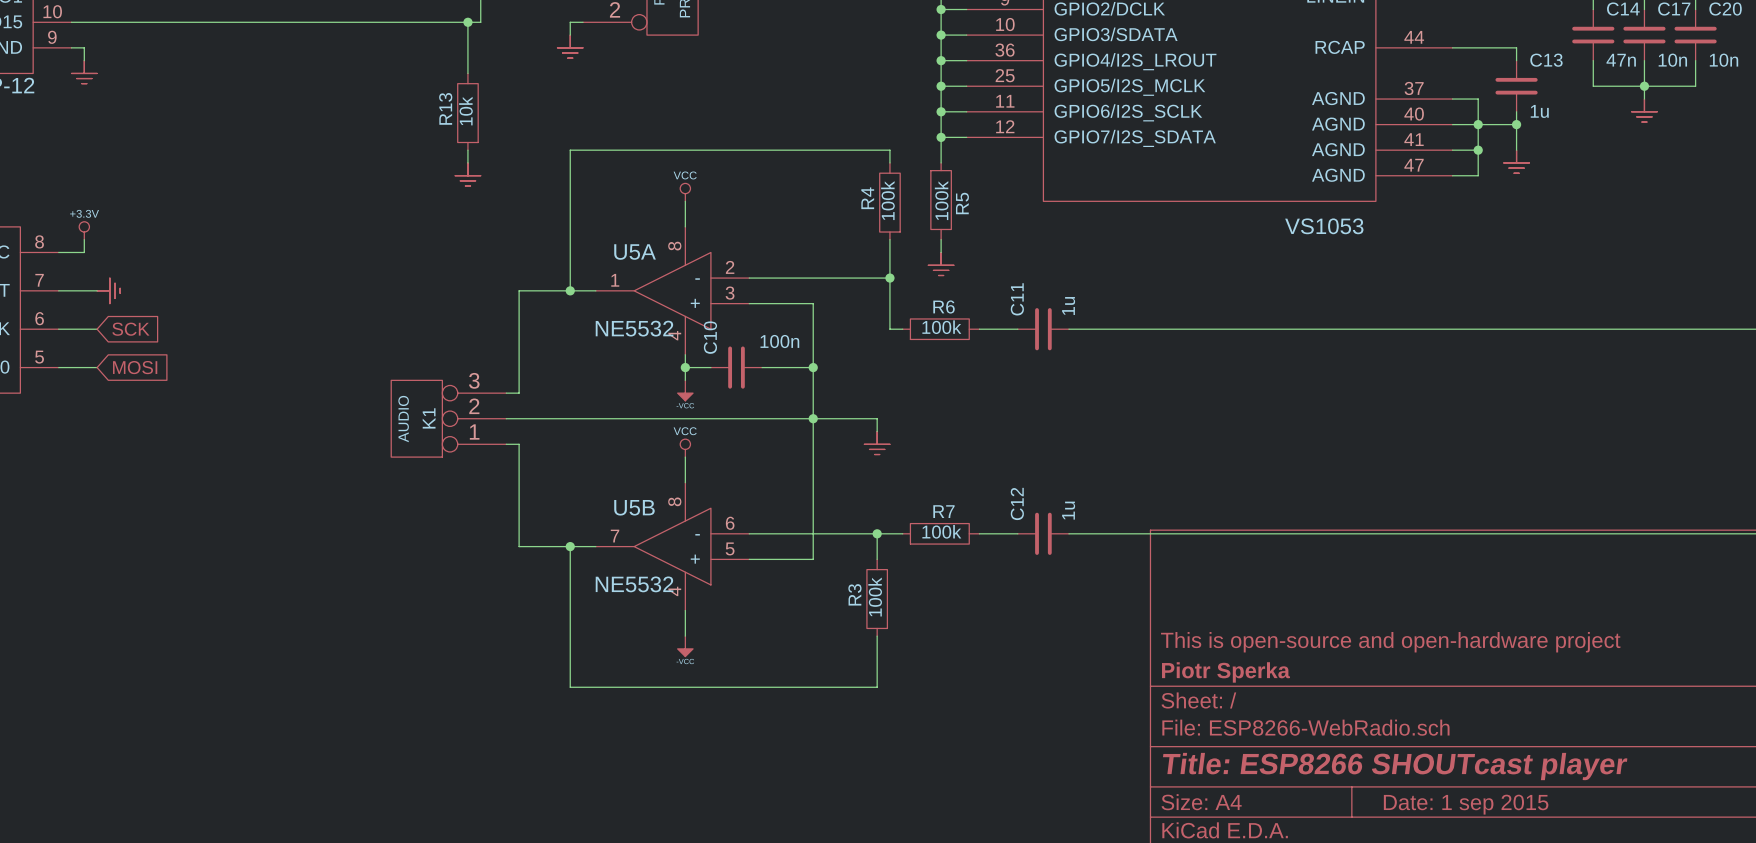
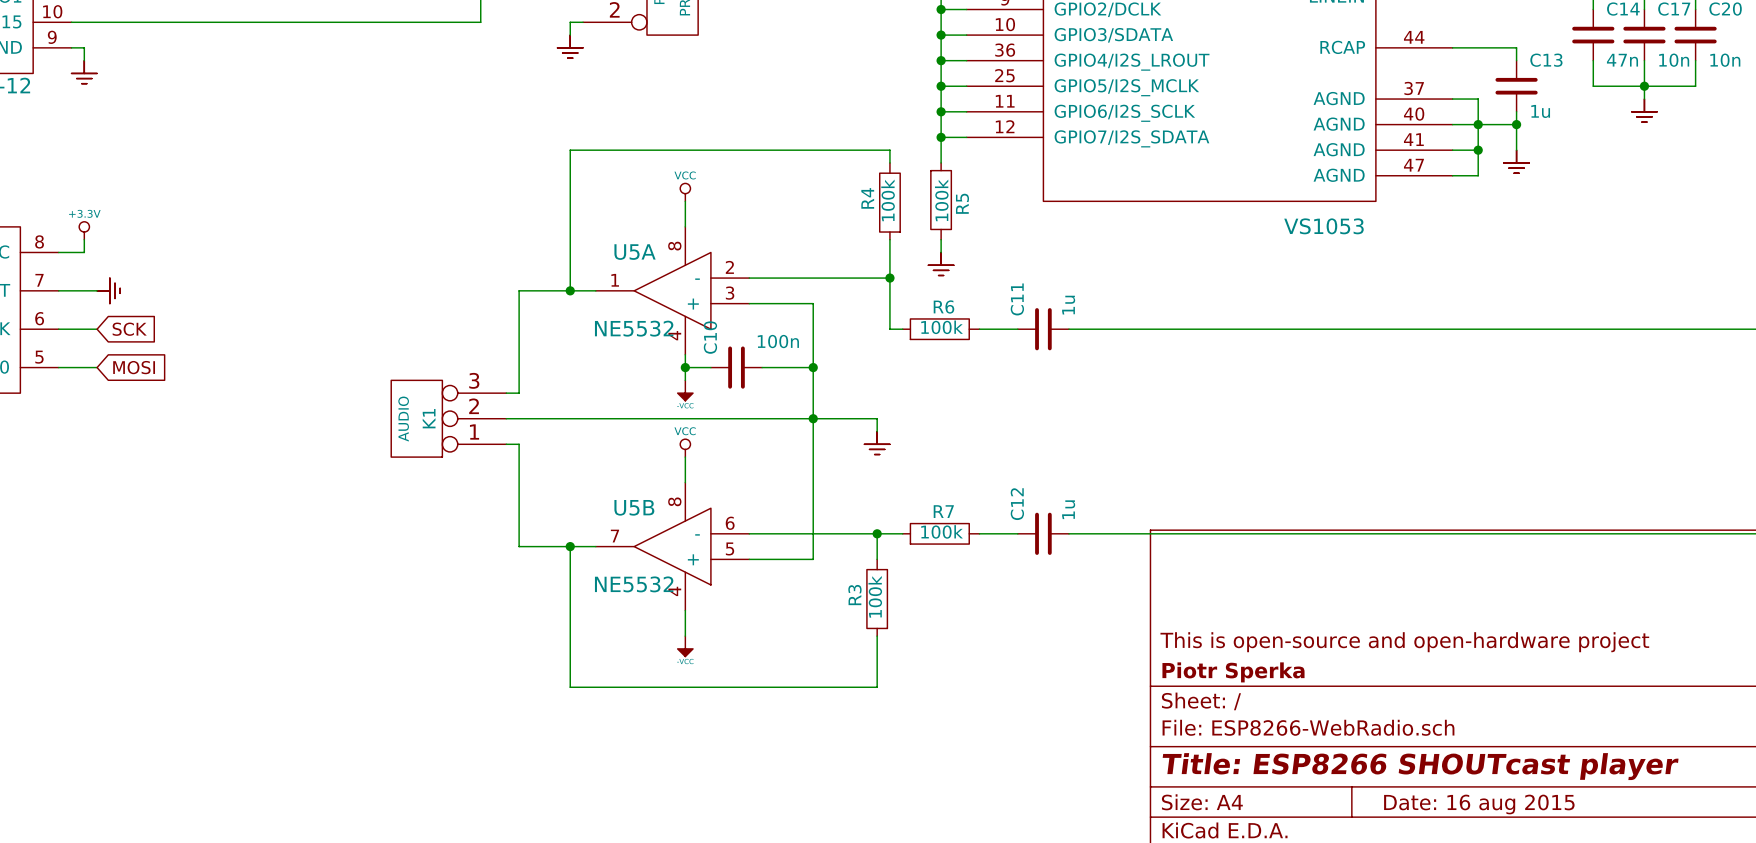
wire: (467, 22) (467, 73) -> none
junction: (467, 22) -> none
R13: 10k (467, 111) -> none
wire: (467, 150) (467, 162) -> none
power symbol: (467, 174) -> none
title block: Date: 1 sep 2015 (1466, 804) -> Date: 16 aug 2015 (1479, 804)

